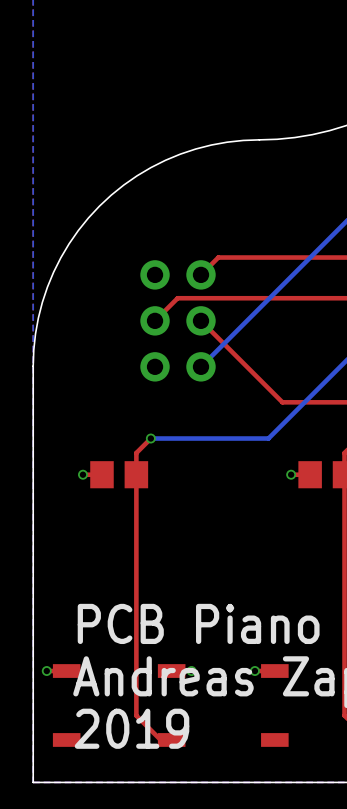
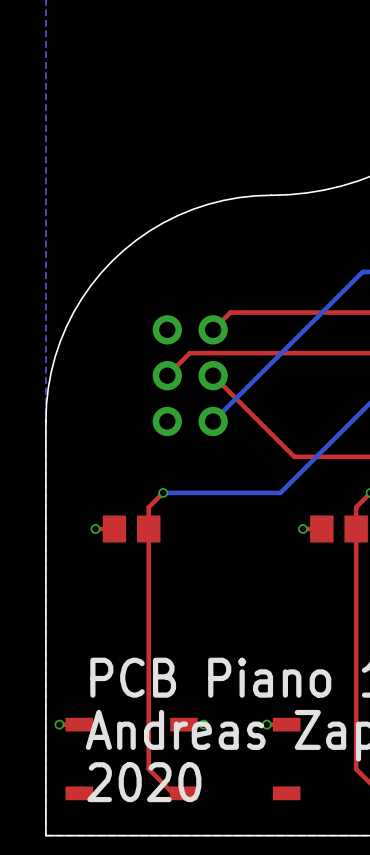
text: 2019 (132, 728) -> 2020 (144, 782)

